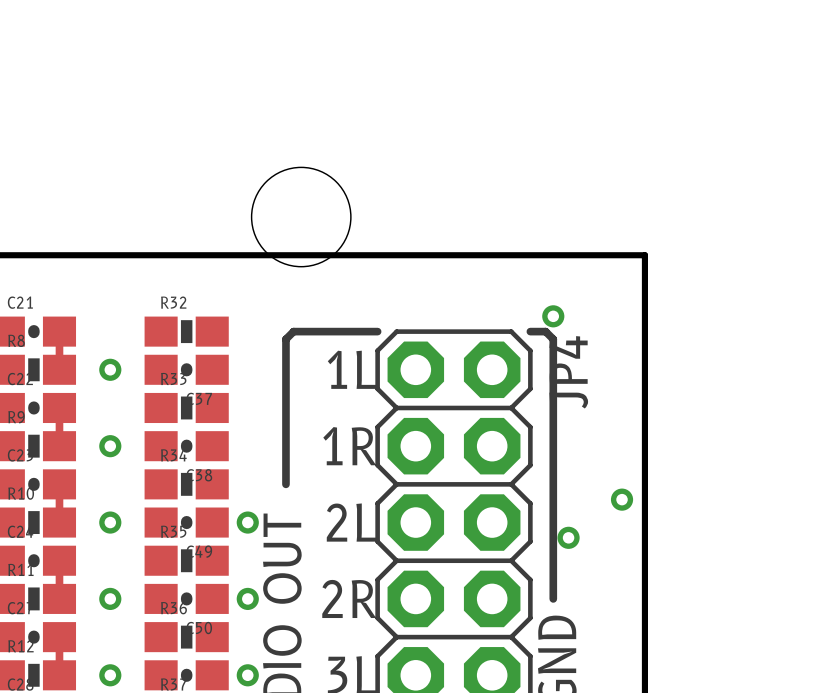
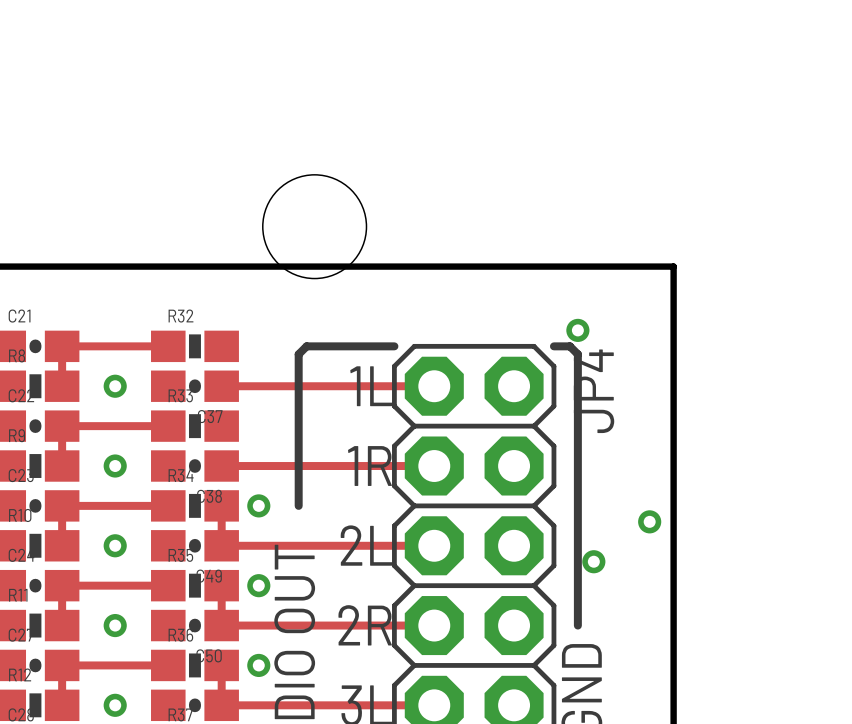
top track: none -> (62, 346) (168, 346)
top track: none -> (221, 386) (434, 386)
top track: none -> (62, 426) (168, 426)
top track: none -> (221, 466) (434, 466)
top track: none -> (62, 505) (168, 505)
top track: none -> (221, 505) (221, 545) (434, 545)
via: none -> (258, 505)
via: (247, 522) -> none
top track: none -> (62, 585) (168, 585)
top track: none -> (221, 585) (221, 625) (434, 625)
via: none -> (258, 585)
via: (247, 598) -> none
top track: none -> (62, 665) (168, 665)
top track: none -> (221, 665) (221, 705) (434, 705)
via: none -> (258, 665)
via: (247, 675) -> none

